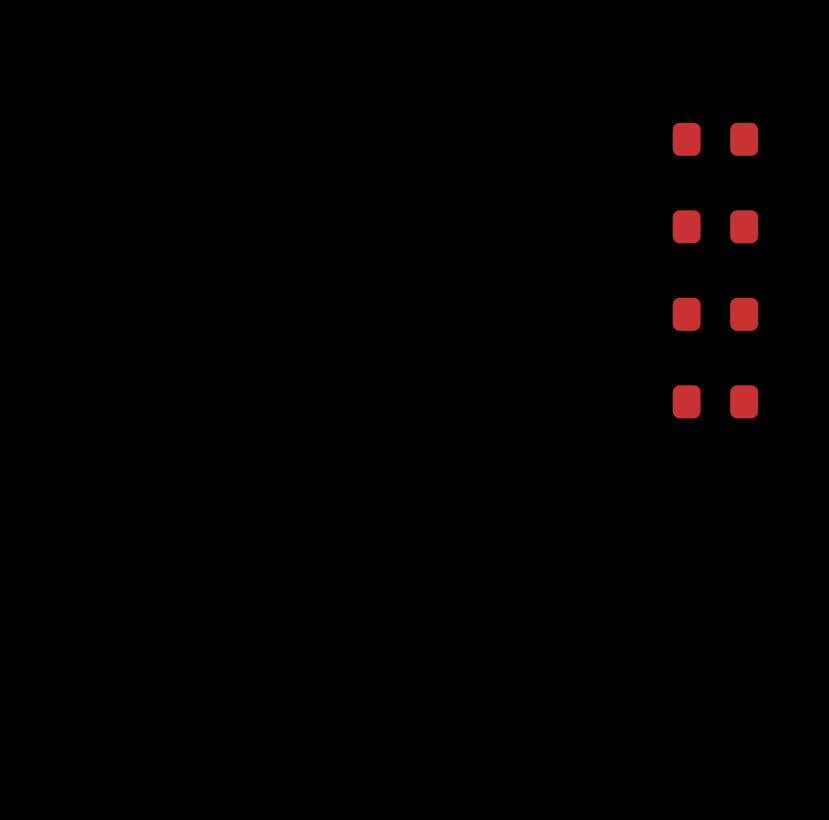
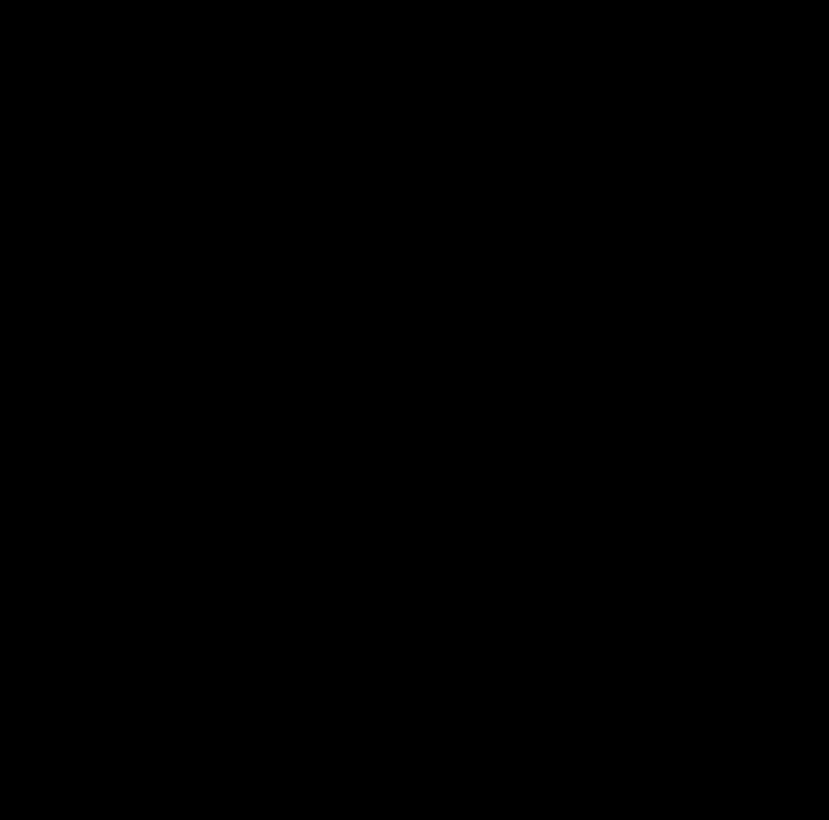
part: (715, 139) -> none
part: (715, 226) -> none
part: (715, 314) -> none
part: (715, 401) -> none

